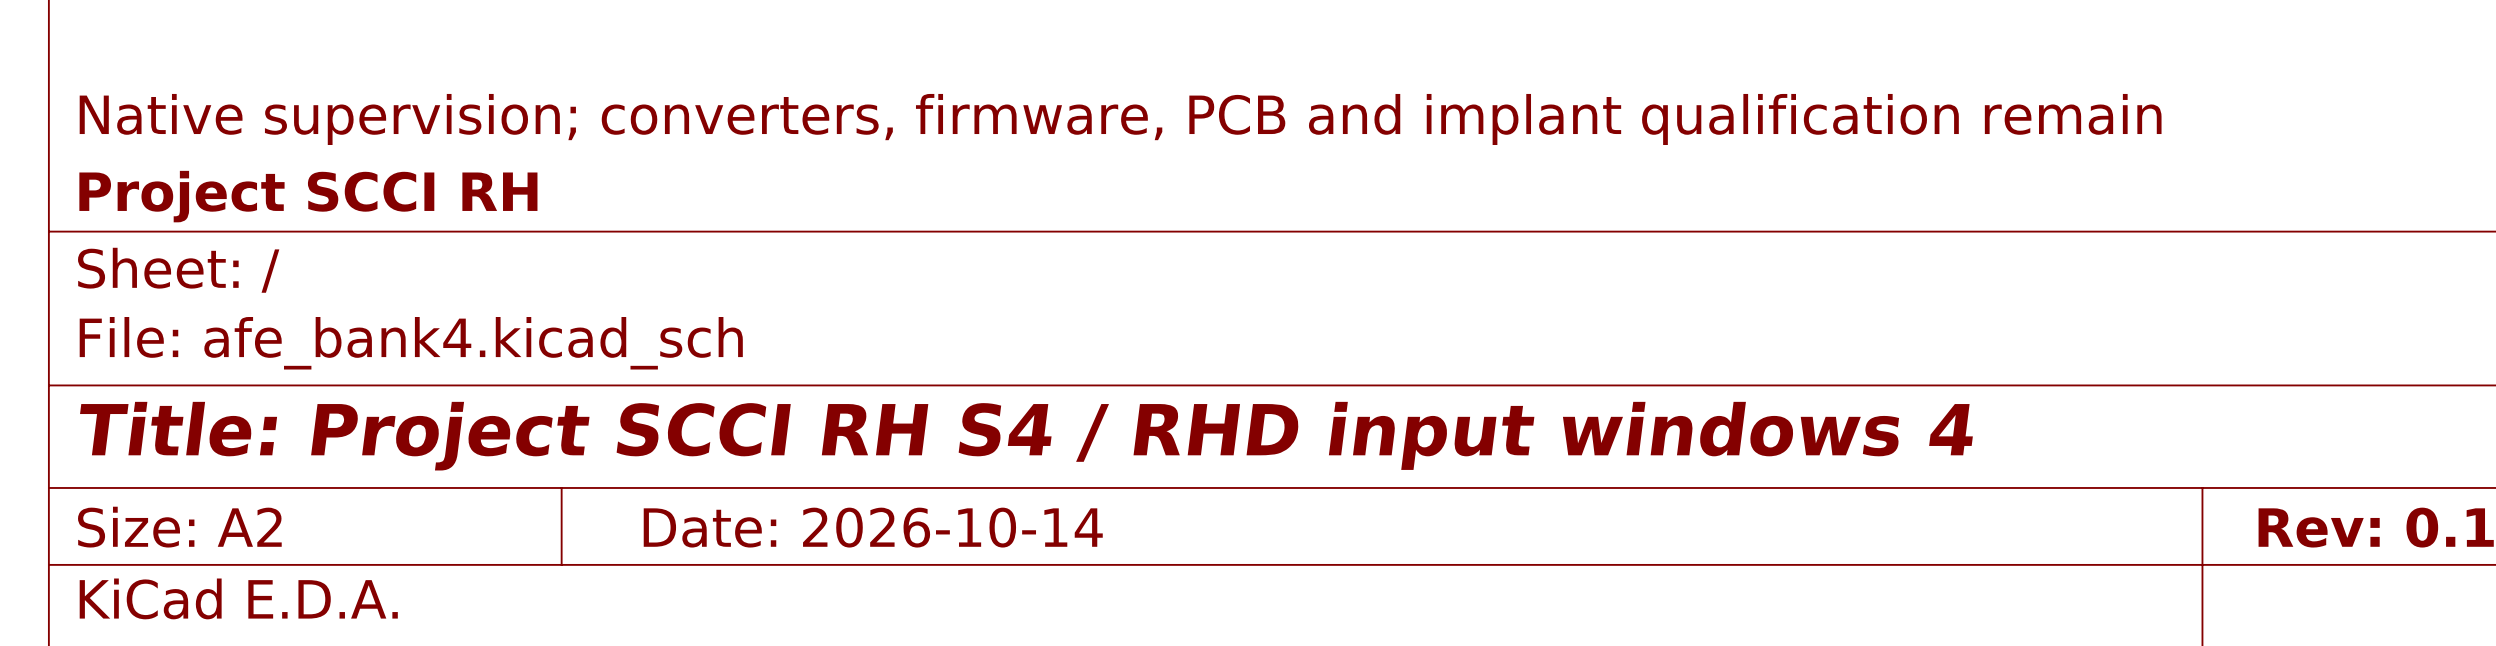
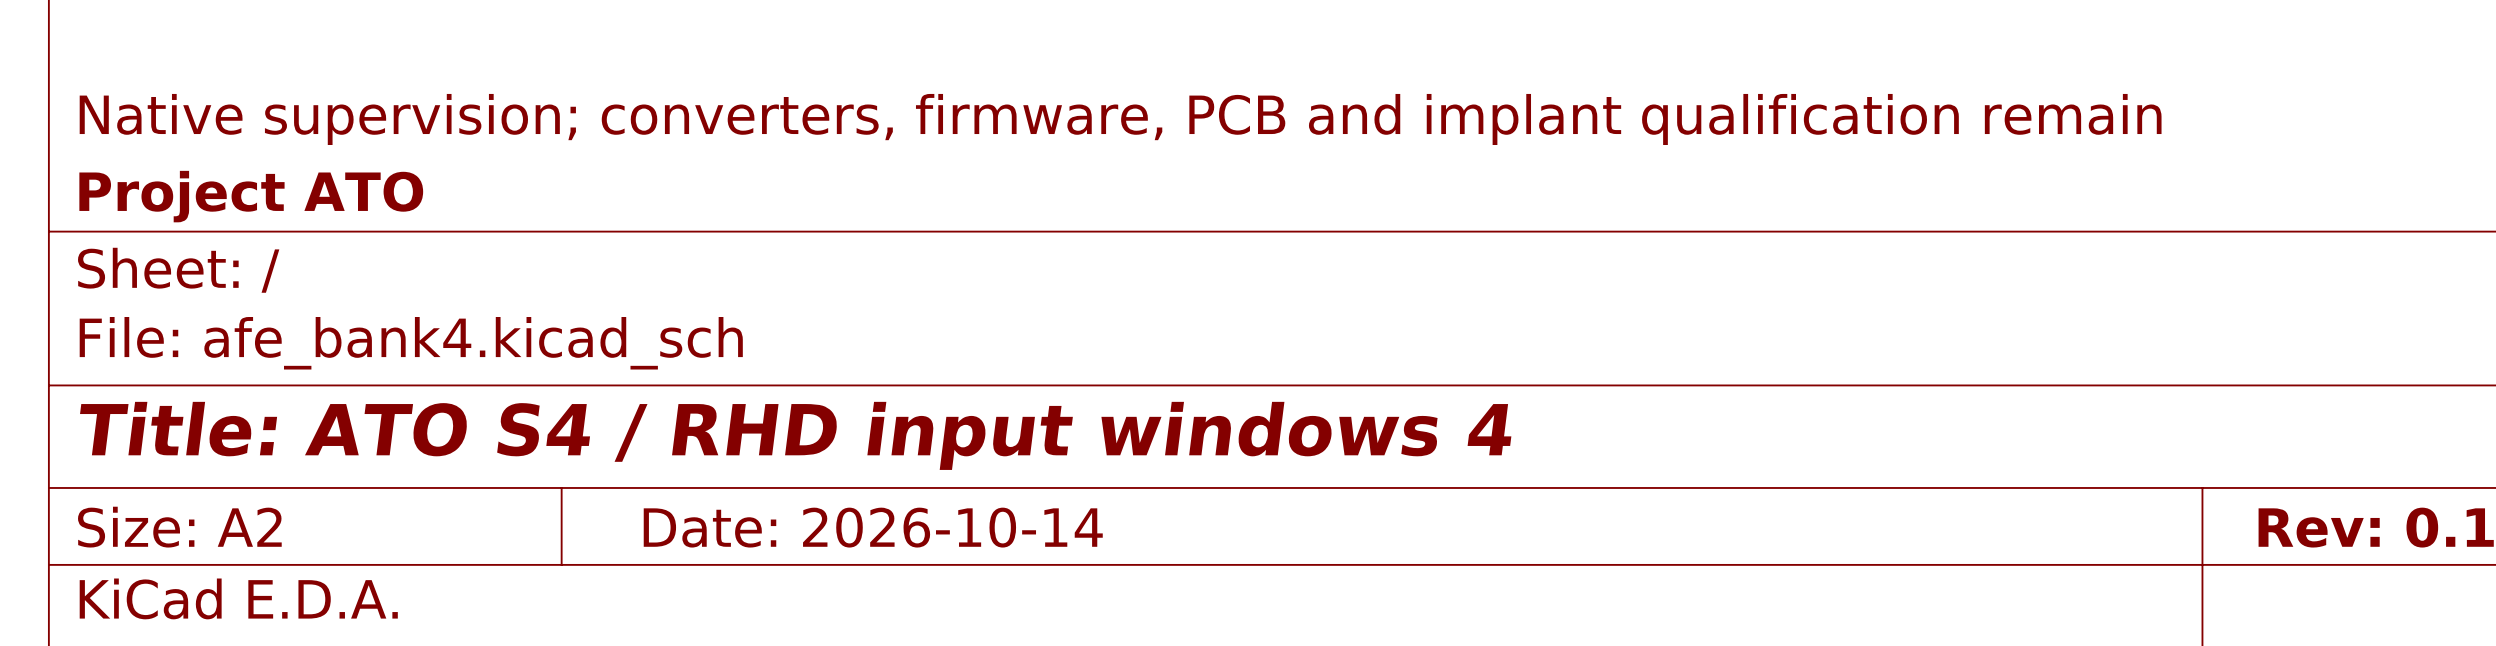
title block: Project SCCI RH (308, 196) -> Project ATO (251, 196)
title block: Title: Project SCCI RH S4 / RHD input windows 4 (1026, 436) -> Title: ATO S4 / RHD input windows 4 (795, 435)

